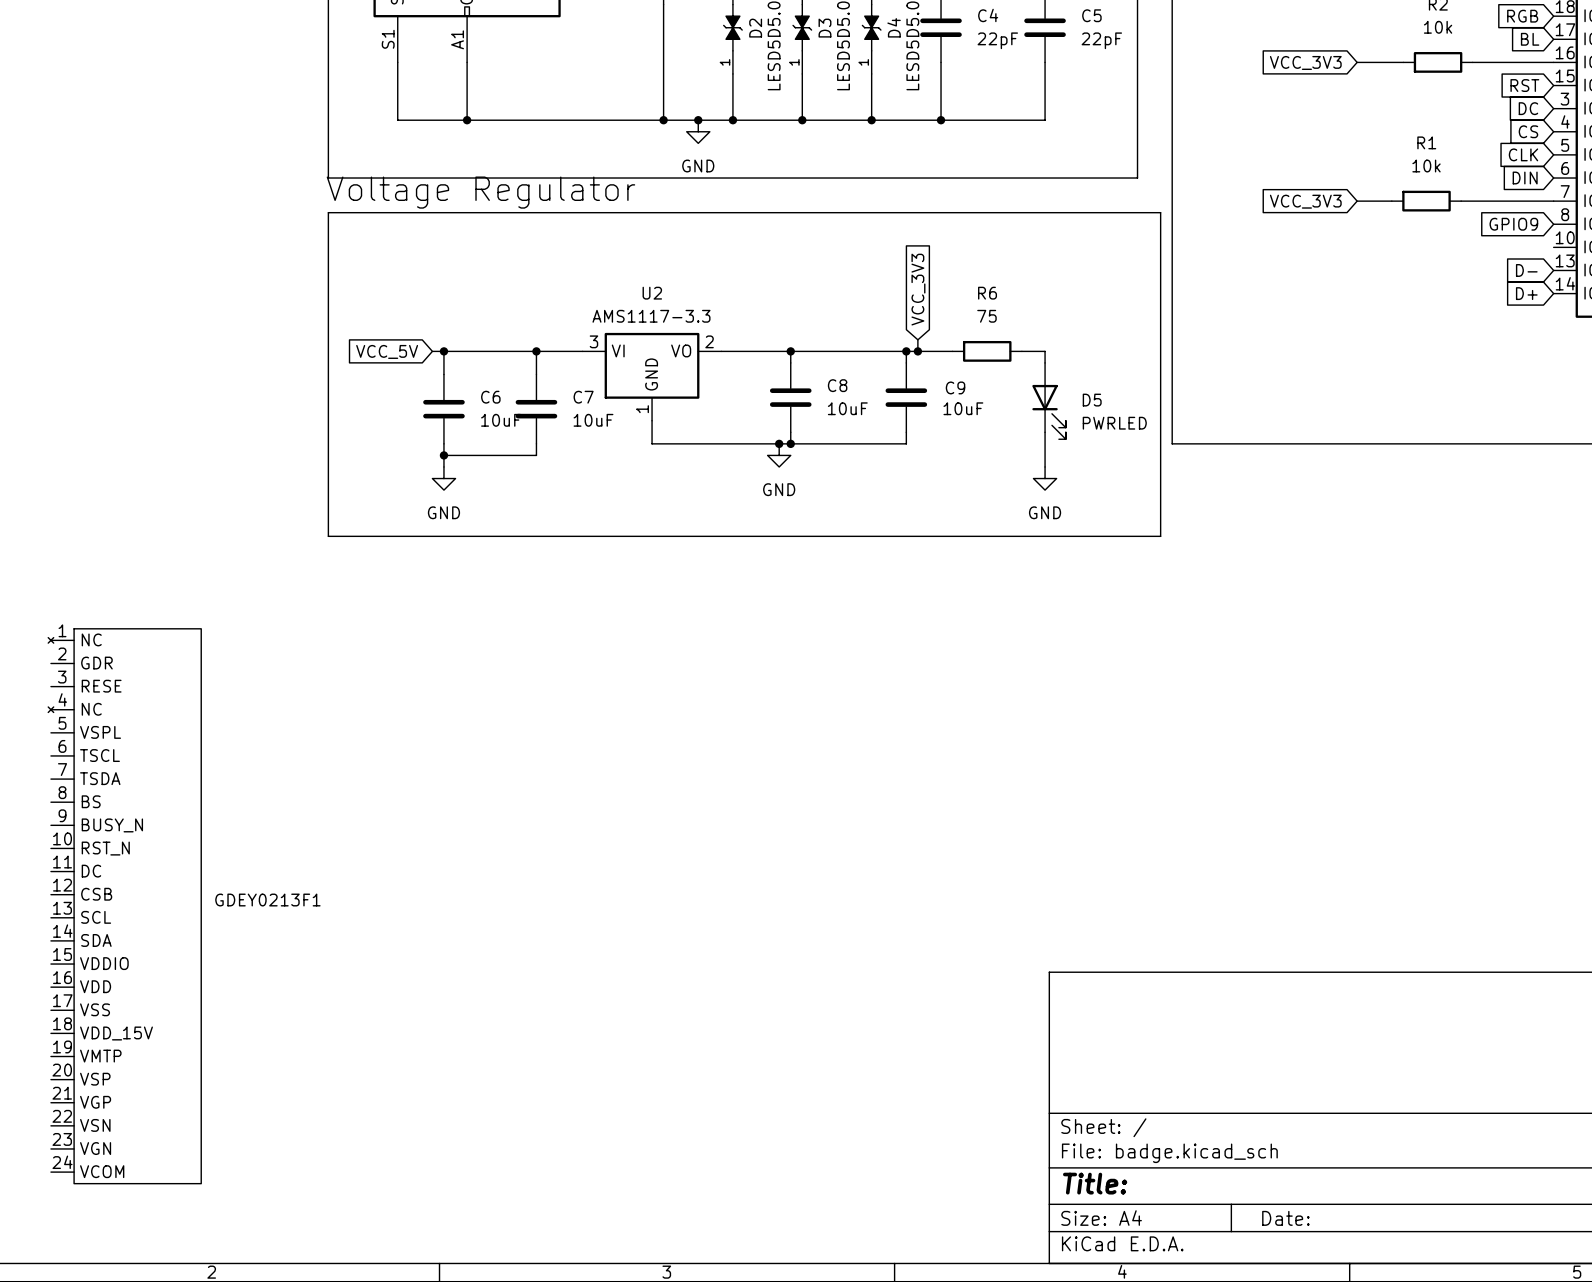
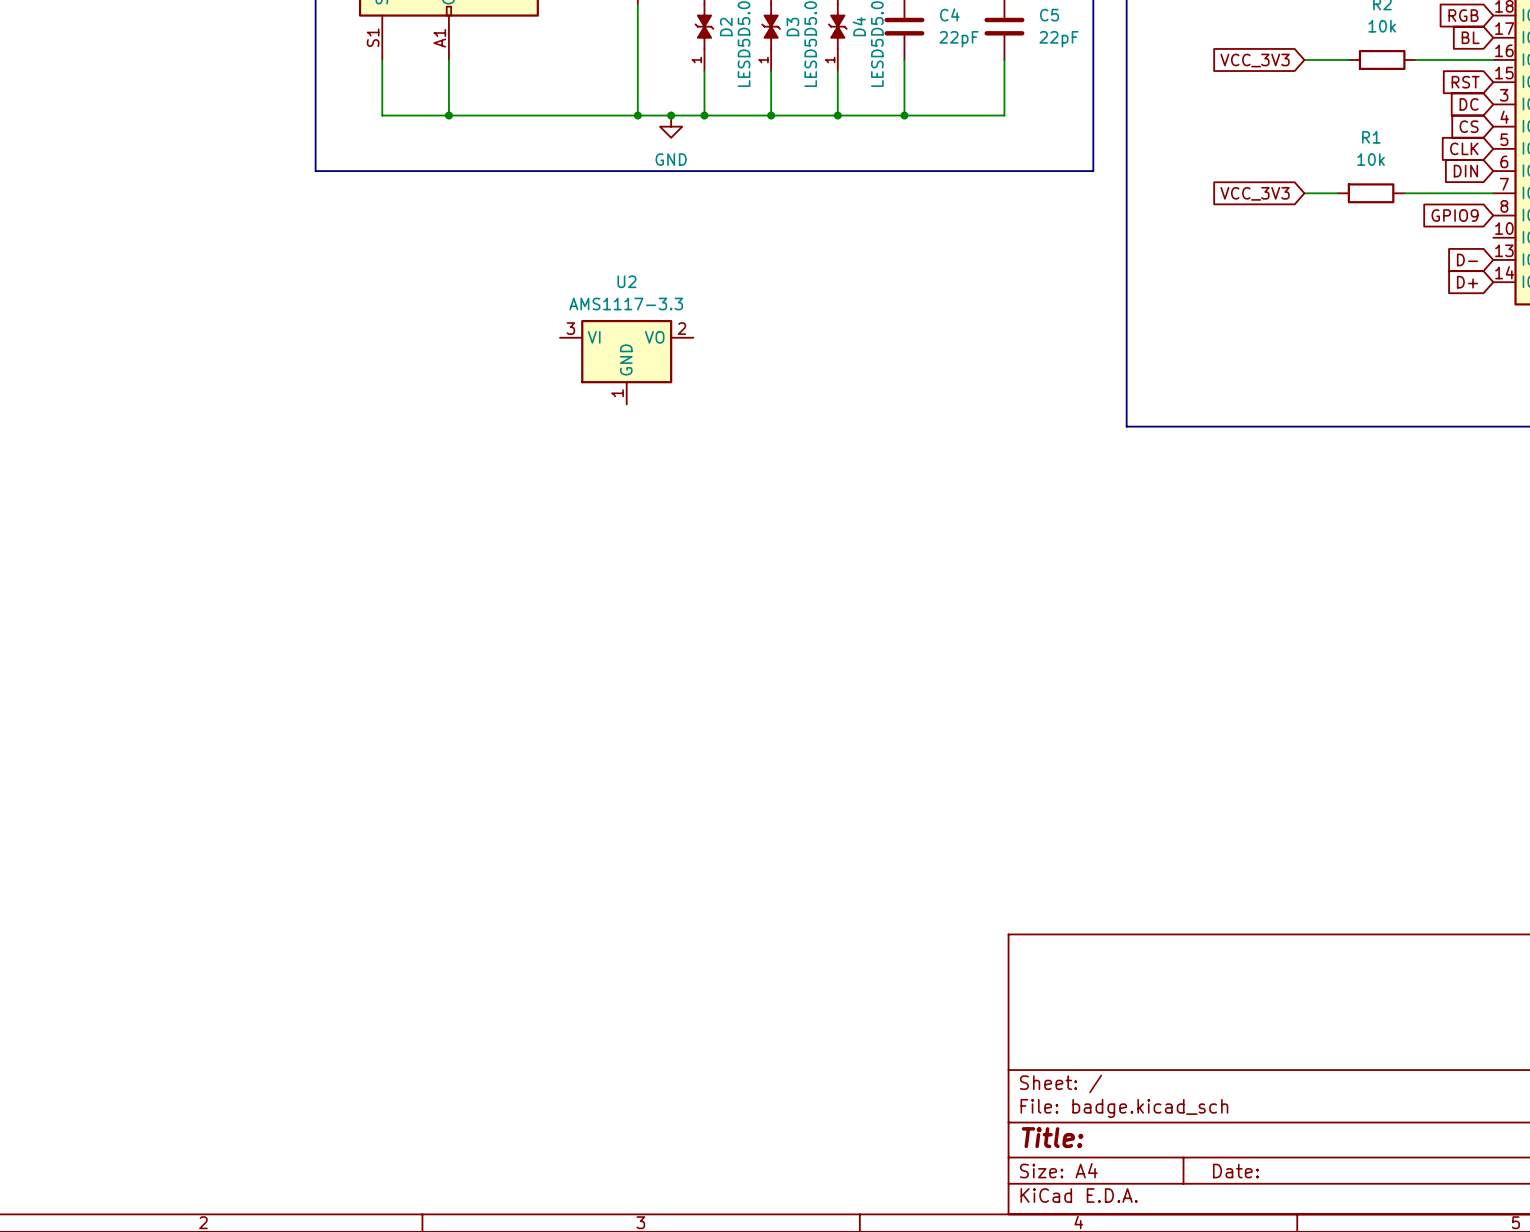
text: Voltage Regulator (480, 192) -> none
line: (328, 212) (328, 536) (1160, 536) (1160, 212) (328, 212) -> none
global label: VCC_3V3 (918, 289) -> none
wire: (917, 339) (917, 351) -> none
global label: VCC_5V (387, 351) -> none
wire: (432, 351) (582, 351) -> none
wire: (443, 351) (443, 374) -> none
junction: (443, 351) -> none
wire: (536, 351) (536, 374) -> none
junction: (536, 351) -> none
wire: (721, 351) (952, 351) -> none
wire: (790, 351) (790, 362) -> none
junction: (790, 351) -> none
wire: (906, 351) (906, 362) -> none
junction: (906, 351) -> none
junction: (917, 351) -> none
R6: 75 (987, 351) -> none
wire: (1021, 351) (1045, 351) (1045, 362) -> none
C8: 10uF (790, 397) -> none
C9: 10uF (906, 397) -> none
D5: PWRLED (1049, 401) -> none
C6: 10uF (443, 409) -> none
C7: 10uF (536, 409) -> none
wire: (652, 420) (652, 443) (906, 443) (906, 432) -> none
wire: (790, 432) (790, 443) -> none
wire: (1045, 432) (1045, 466) -> none
wire: (443, 443) (443, 466) -> none
wire: (536, 443) (536, 455) (443, 455) -> none
junction: (779, 443) -> none
junction: (790, 443) -> none
junction: (443, 455) -> none
power symbol: GND (779, 455) -> none
power symbol: GND (443, 478) -> none
power symbol: GND (1045, 478) -> none
GDEY0213F1: (124, 906) -> none

